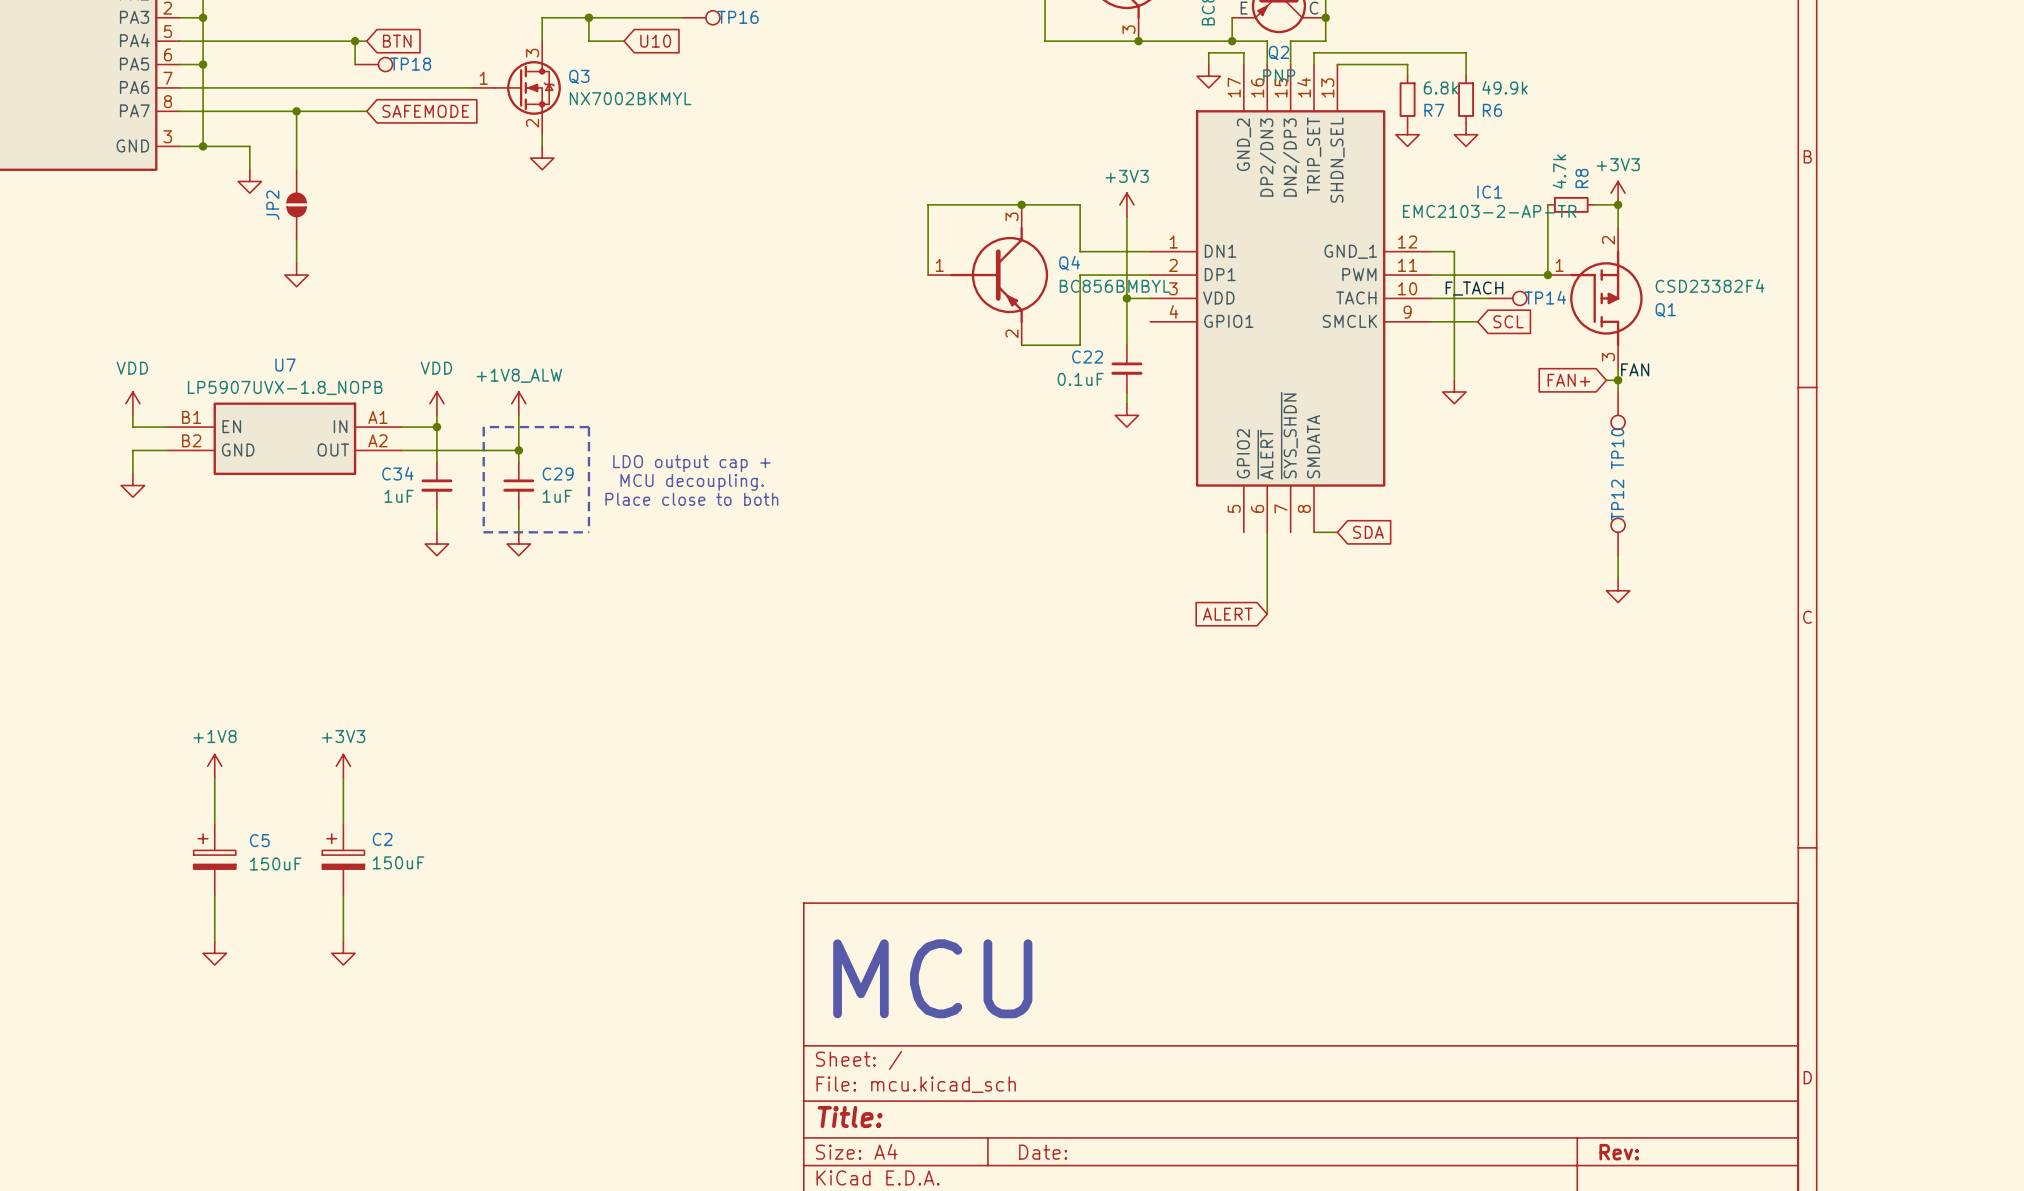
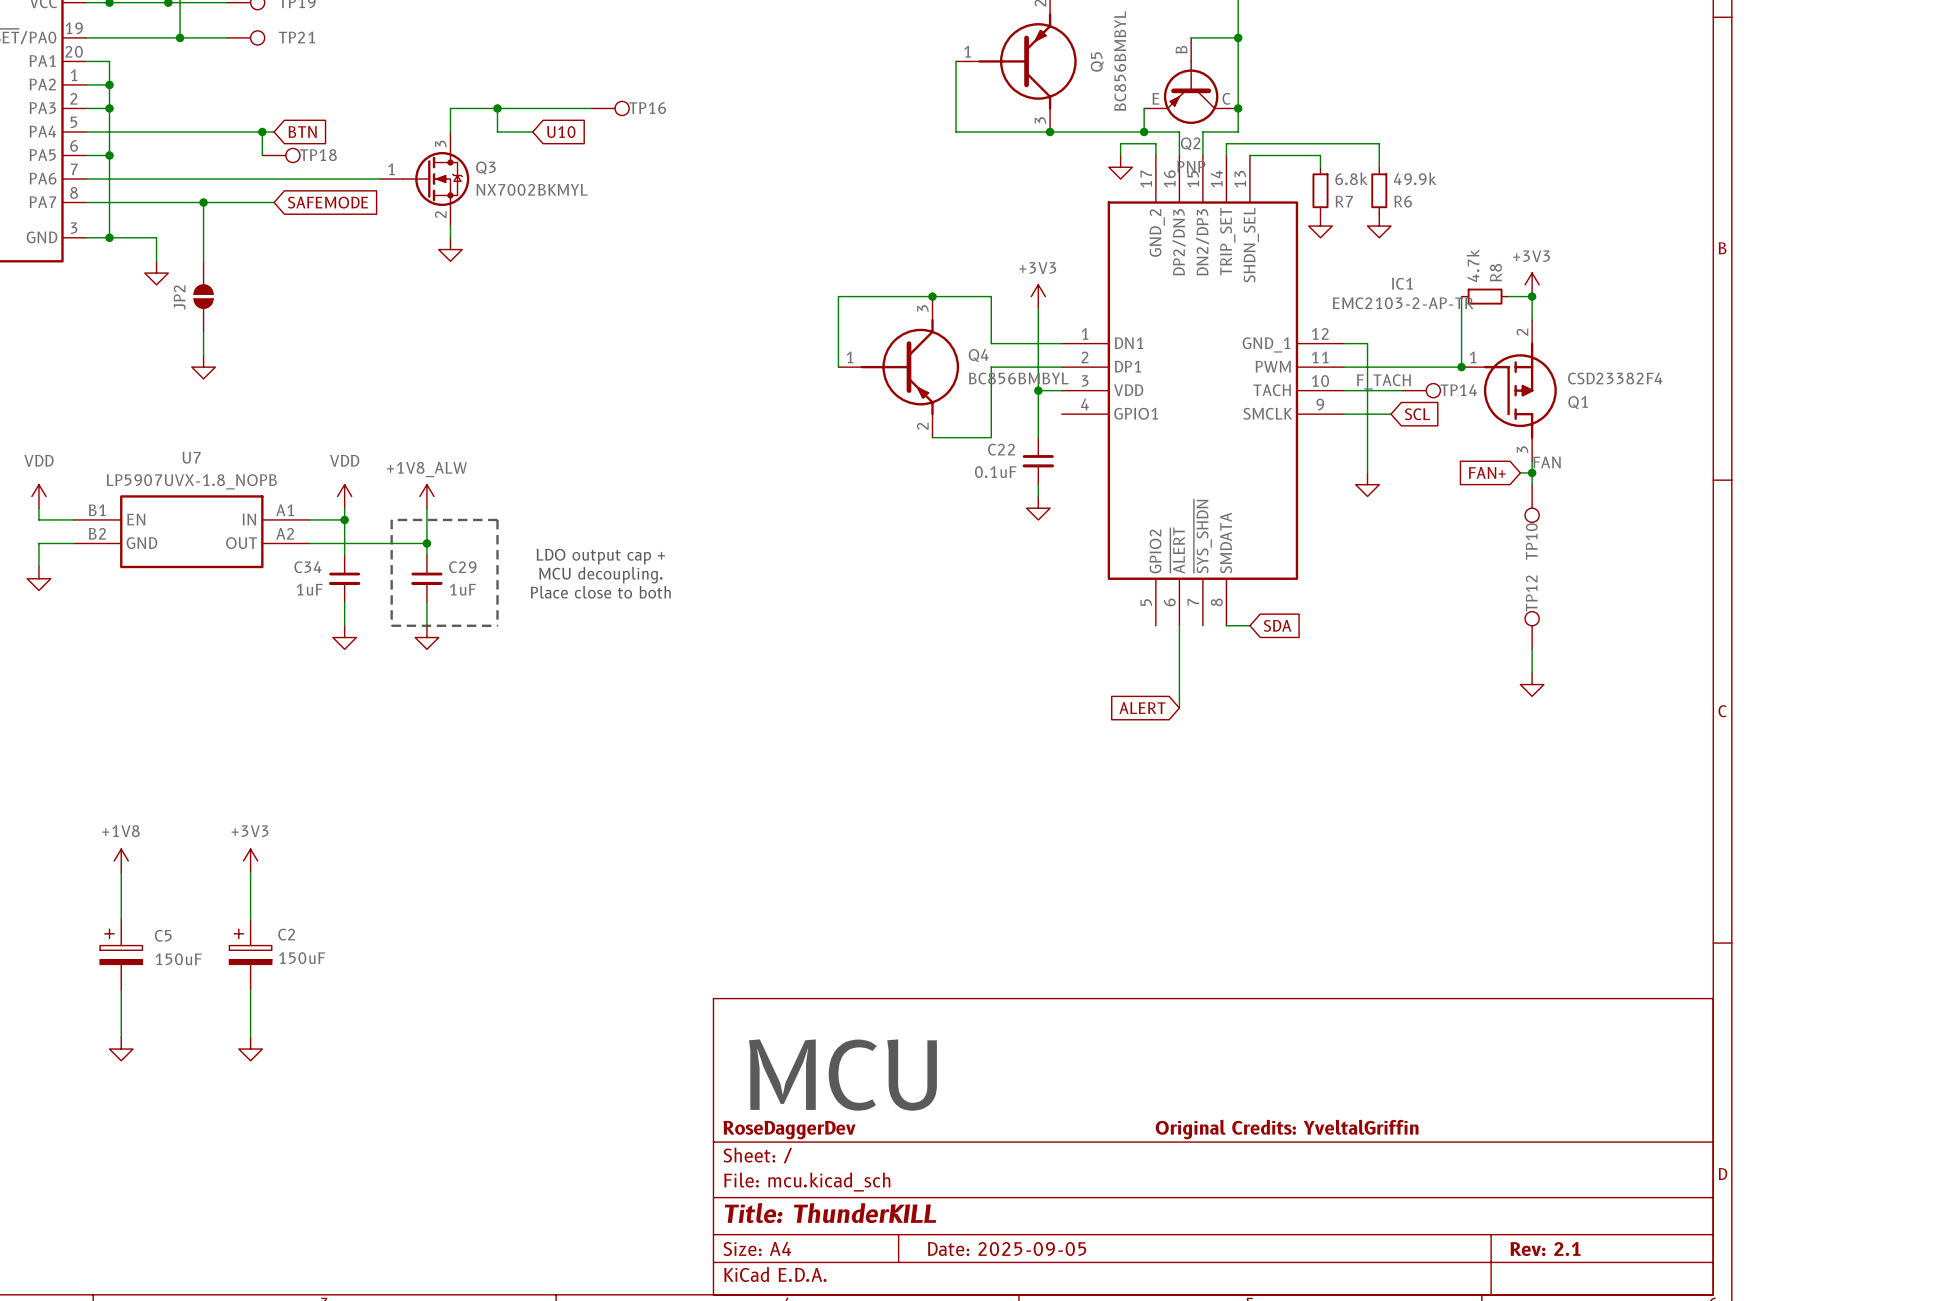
title block: none -> RoseDaggerDev Original Credits: YveltalGriffin (1071, 1129)
title block: Title: (850, 1116) -> Title: ThunderKILL (830, 1213)
title block: Date: (1043, 1152) -> Date: 2025-09-05 (1007, 1249)
title block: Rev: (1619, 1152) -> Rev: 2.1 (1545, 1249)

